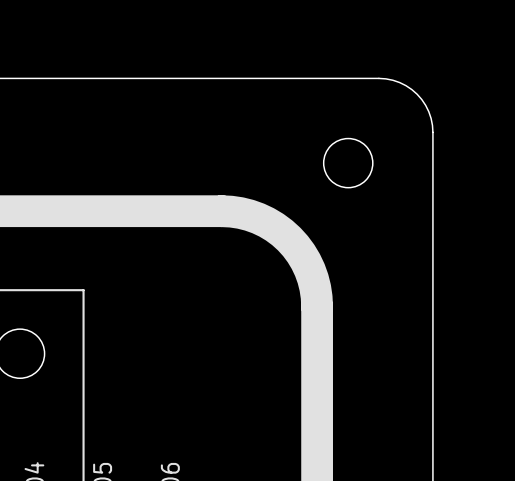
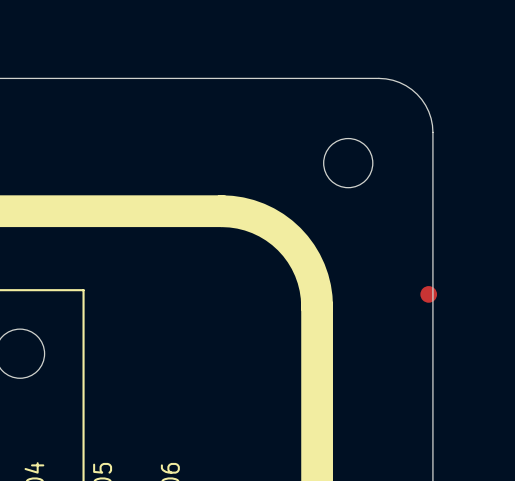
part: none -> (428, 294)

